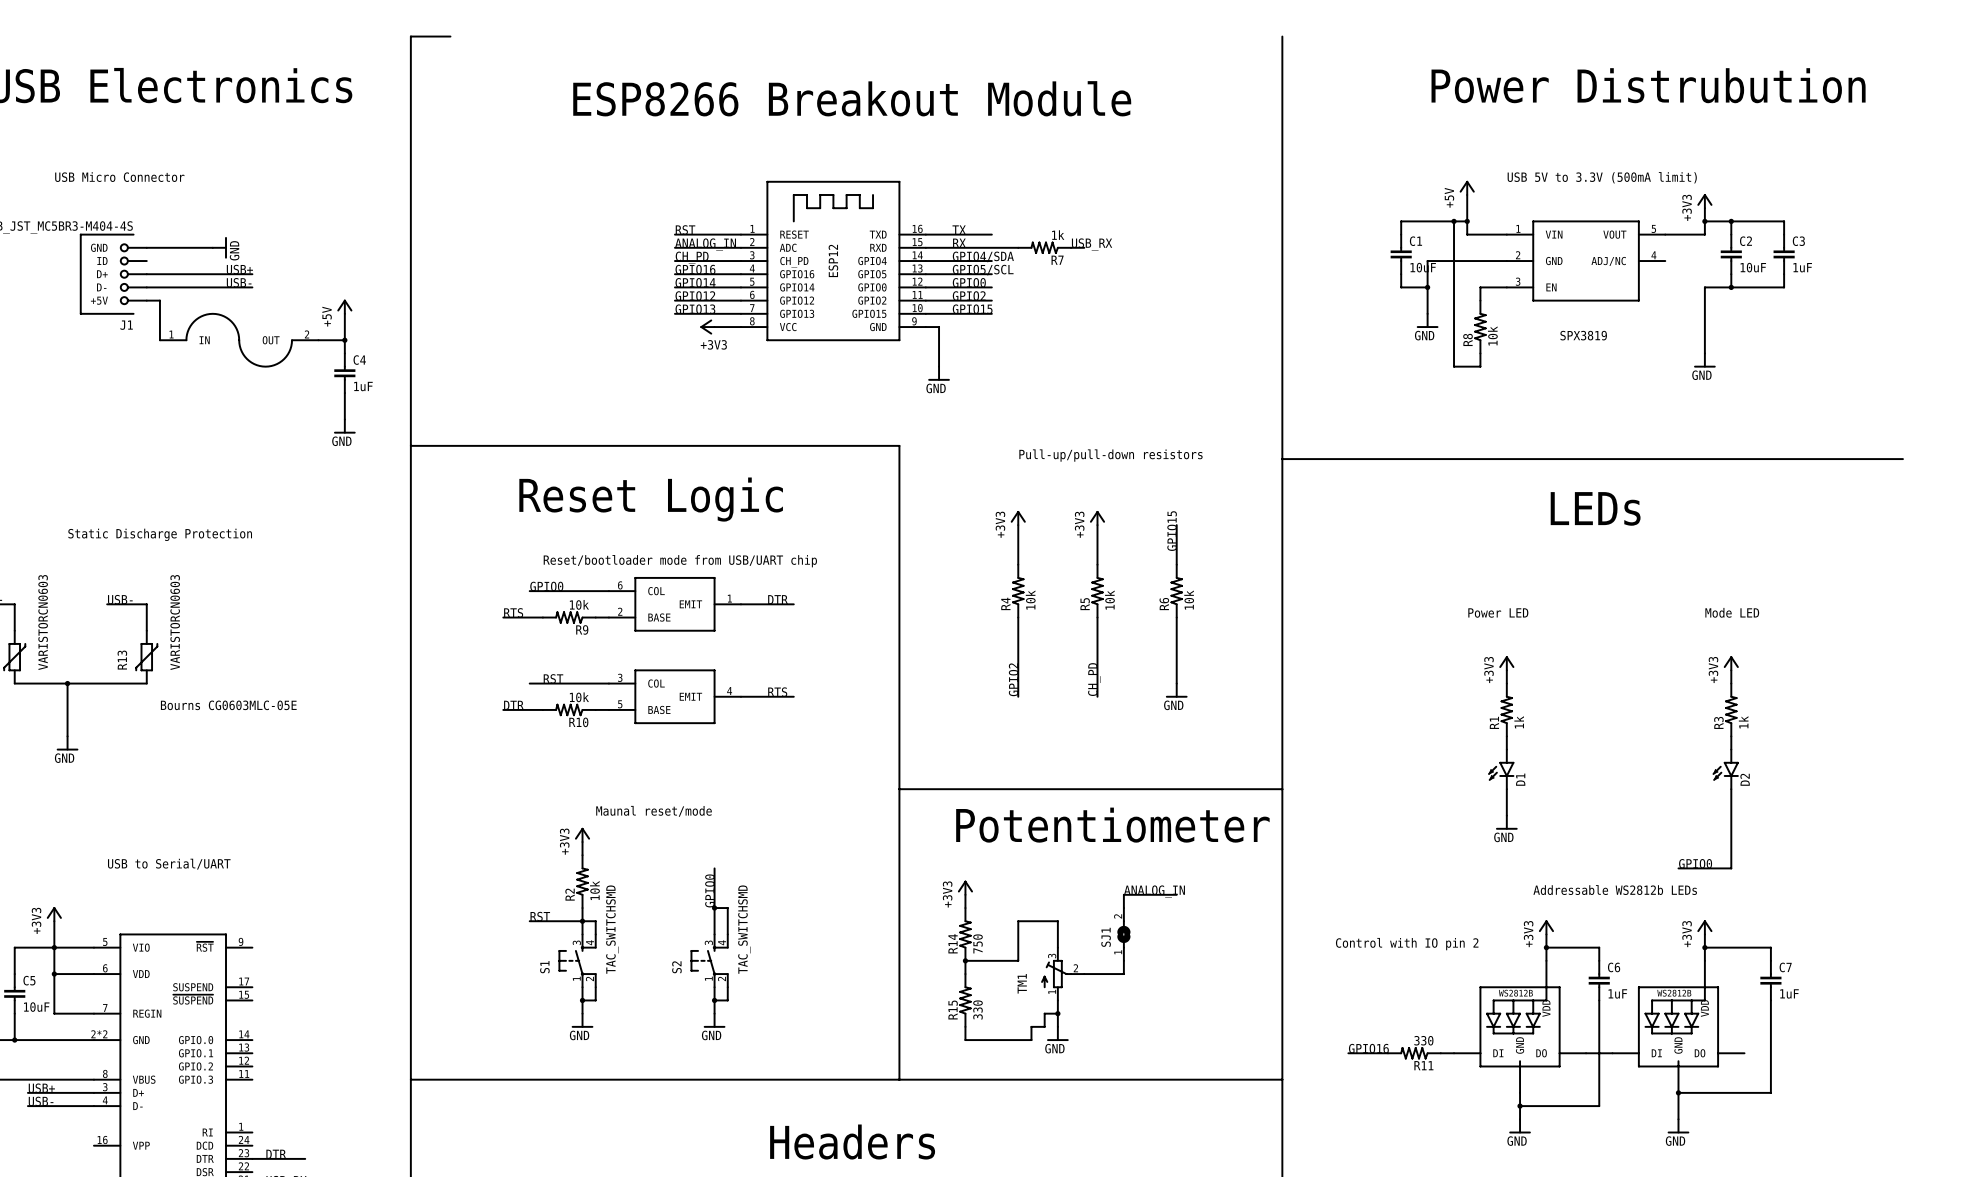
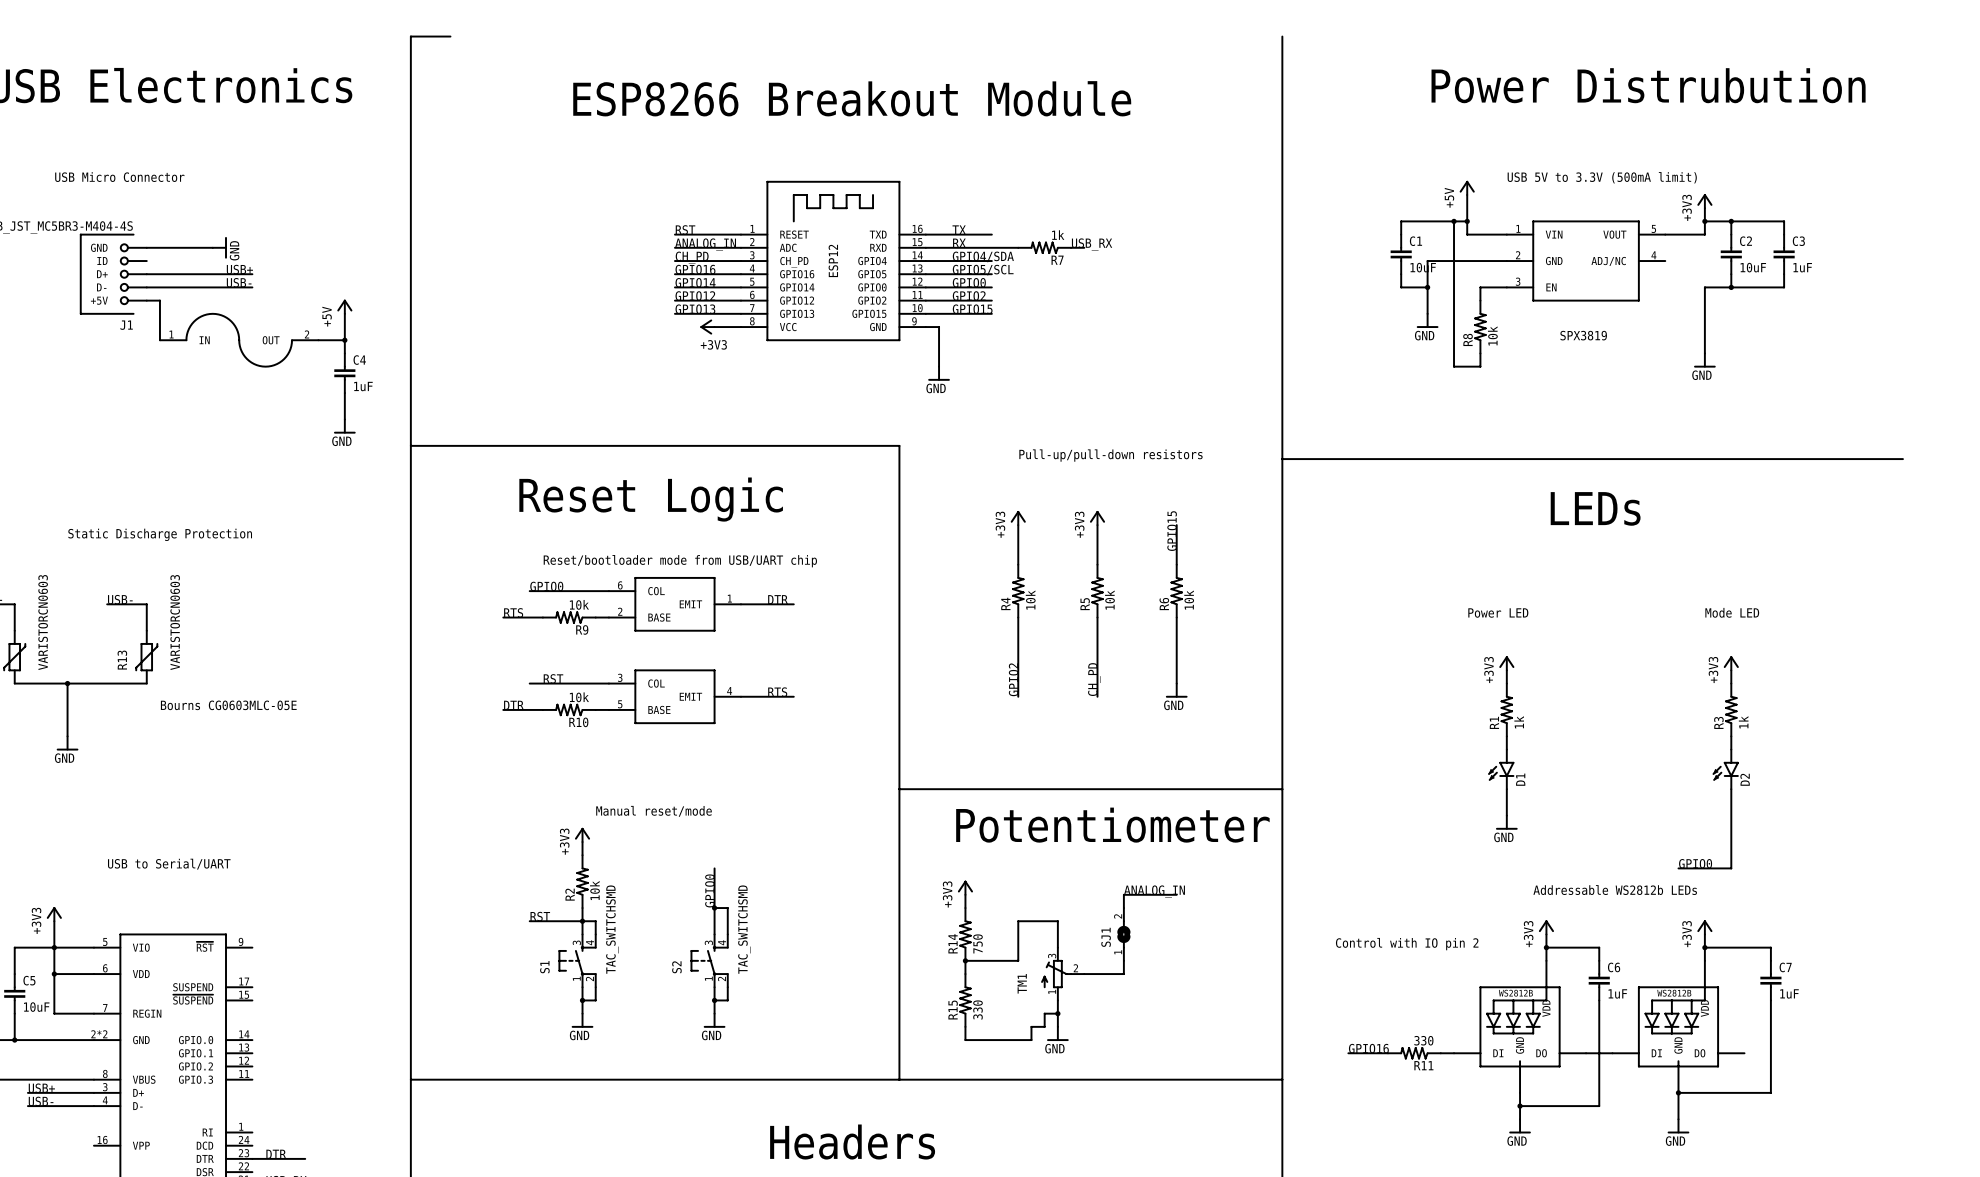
text: Maunal reset/mode (654, 811) -> Manual reset/mode (654, 811)

